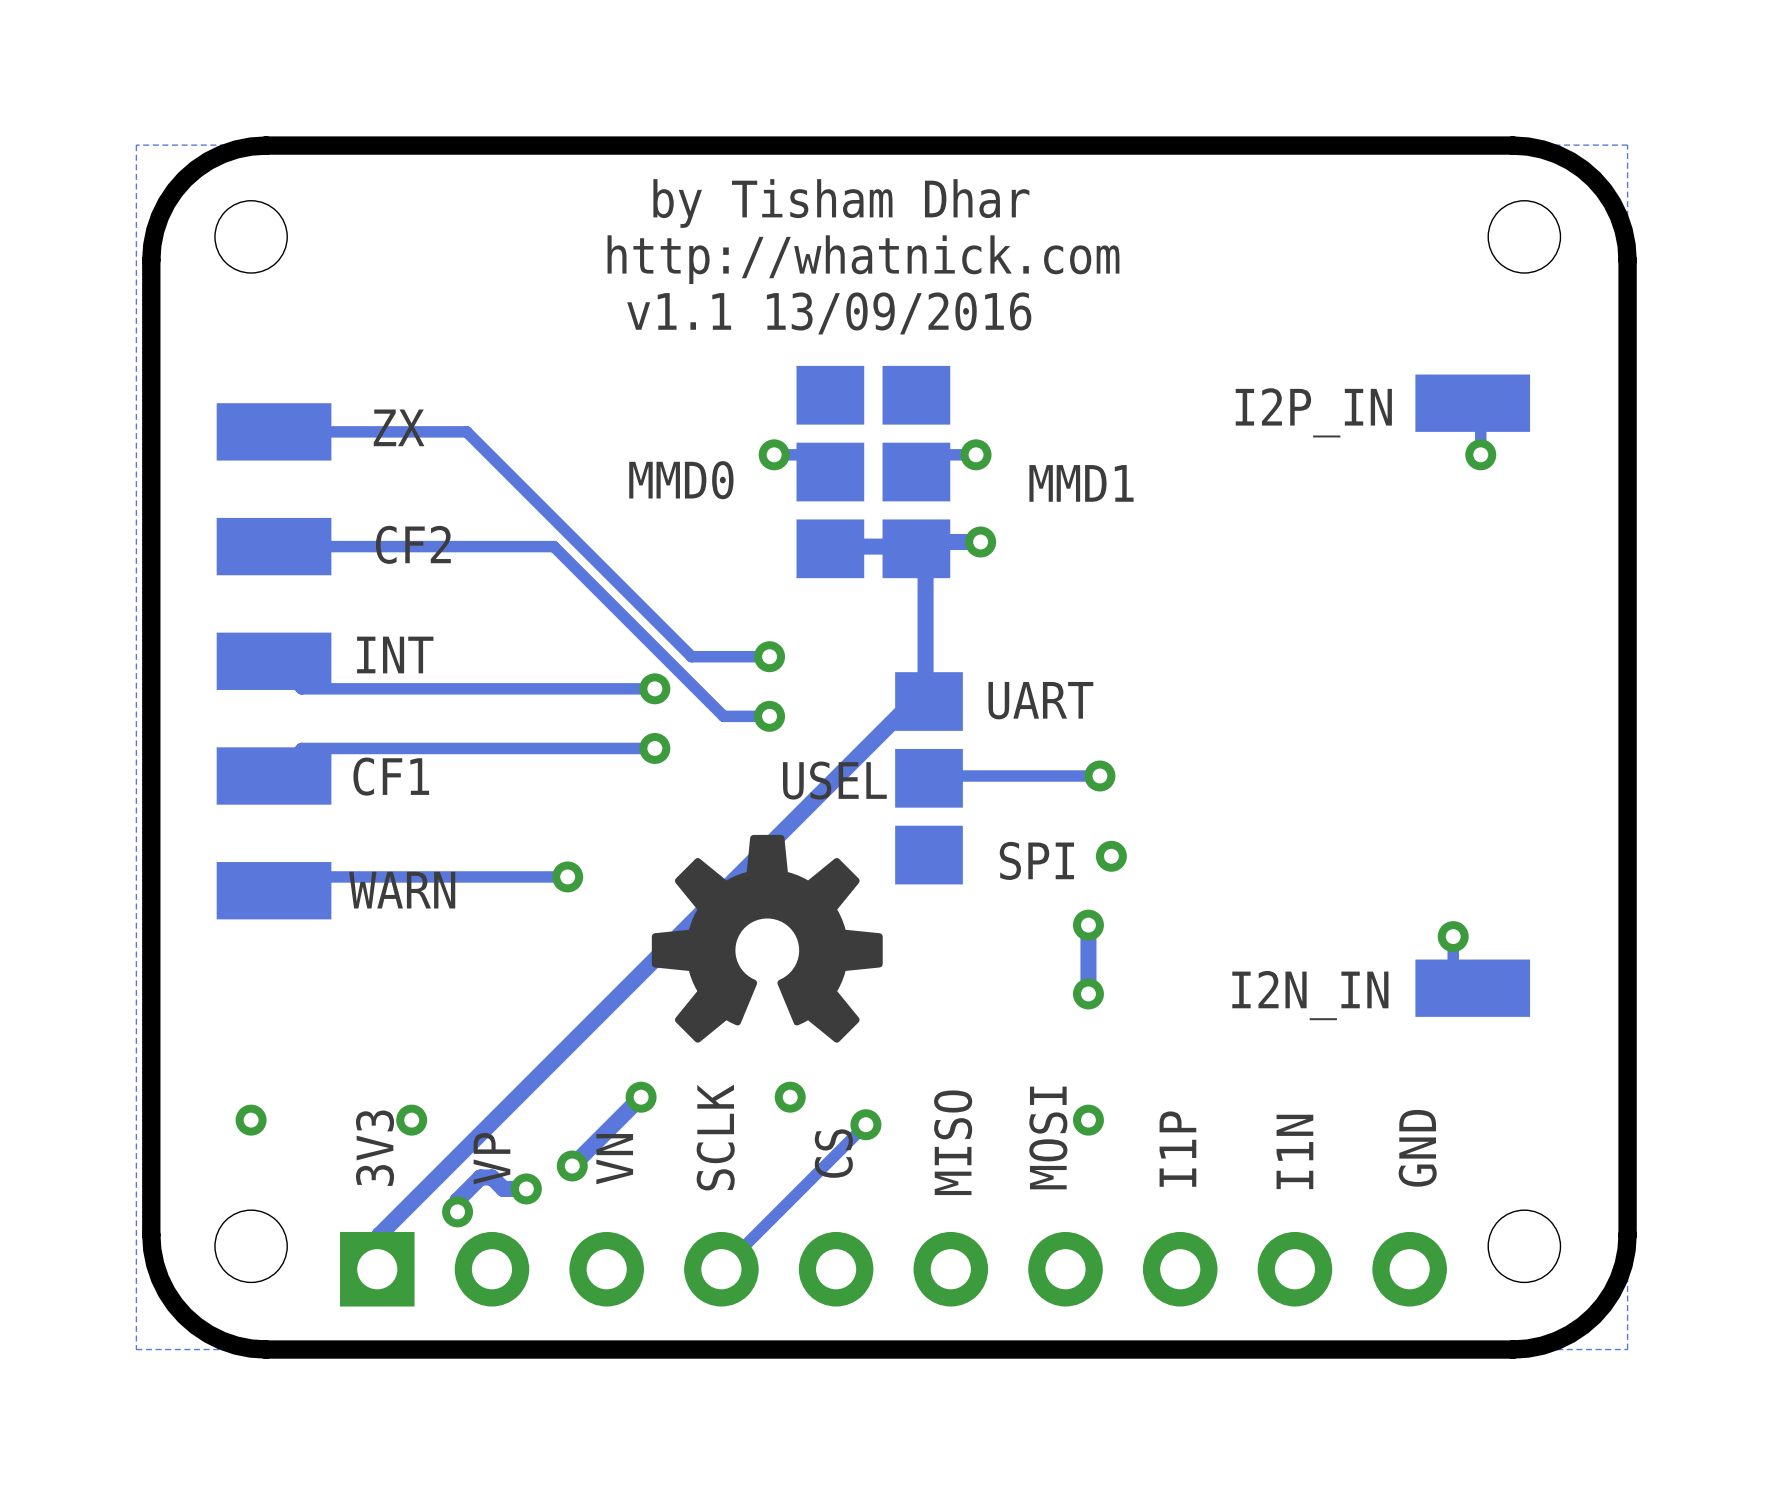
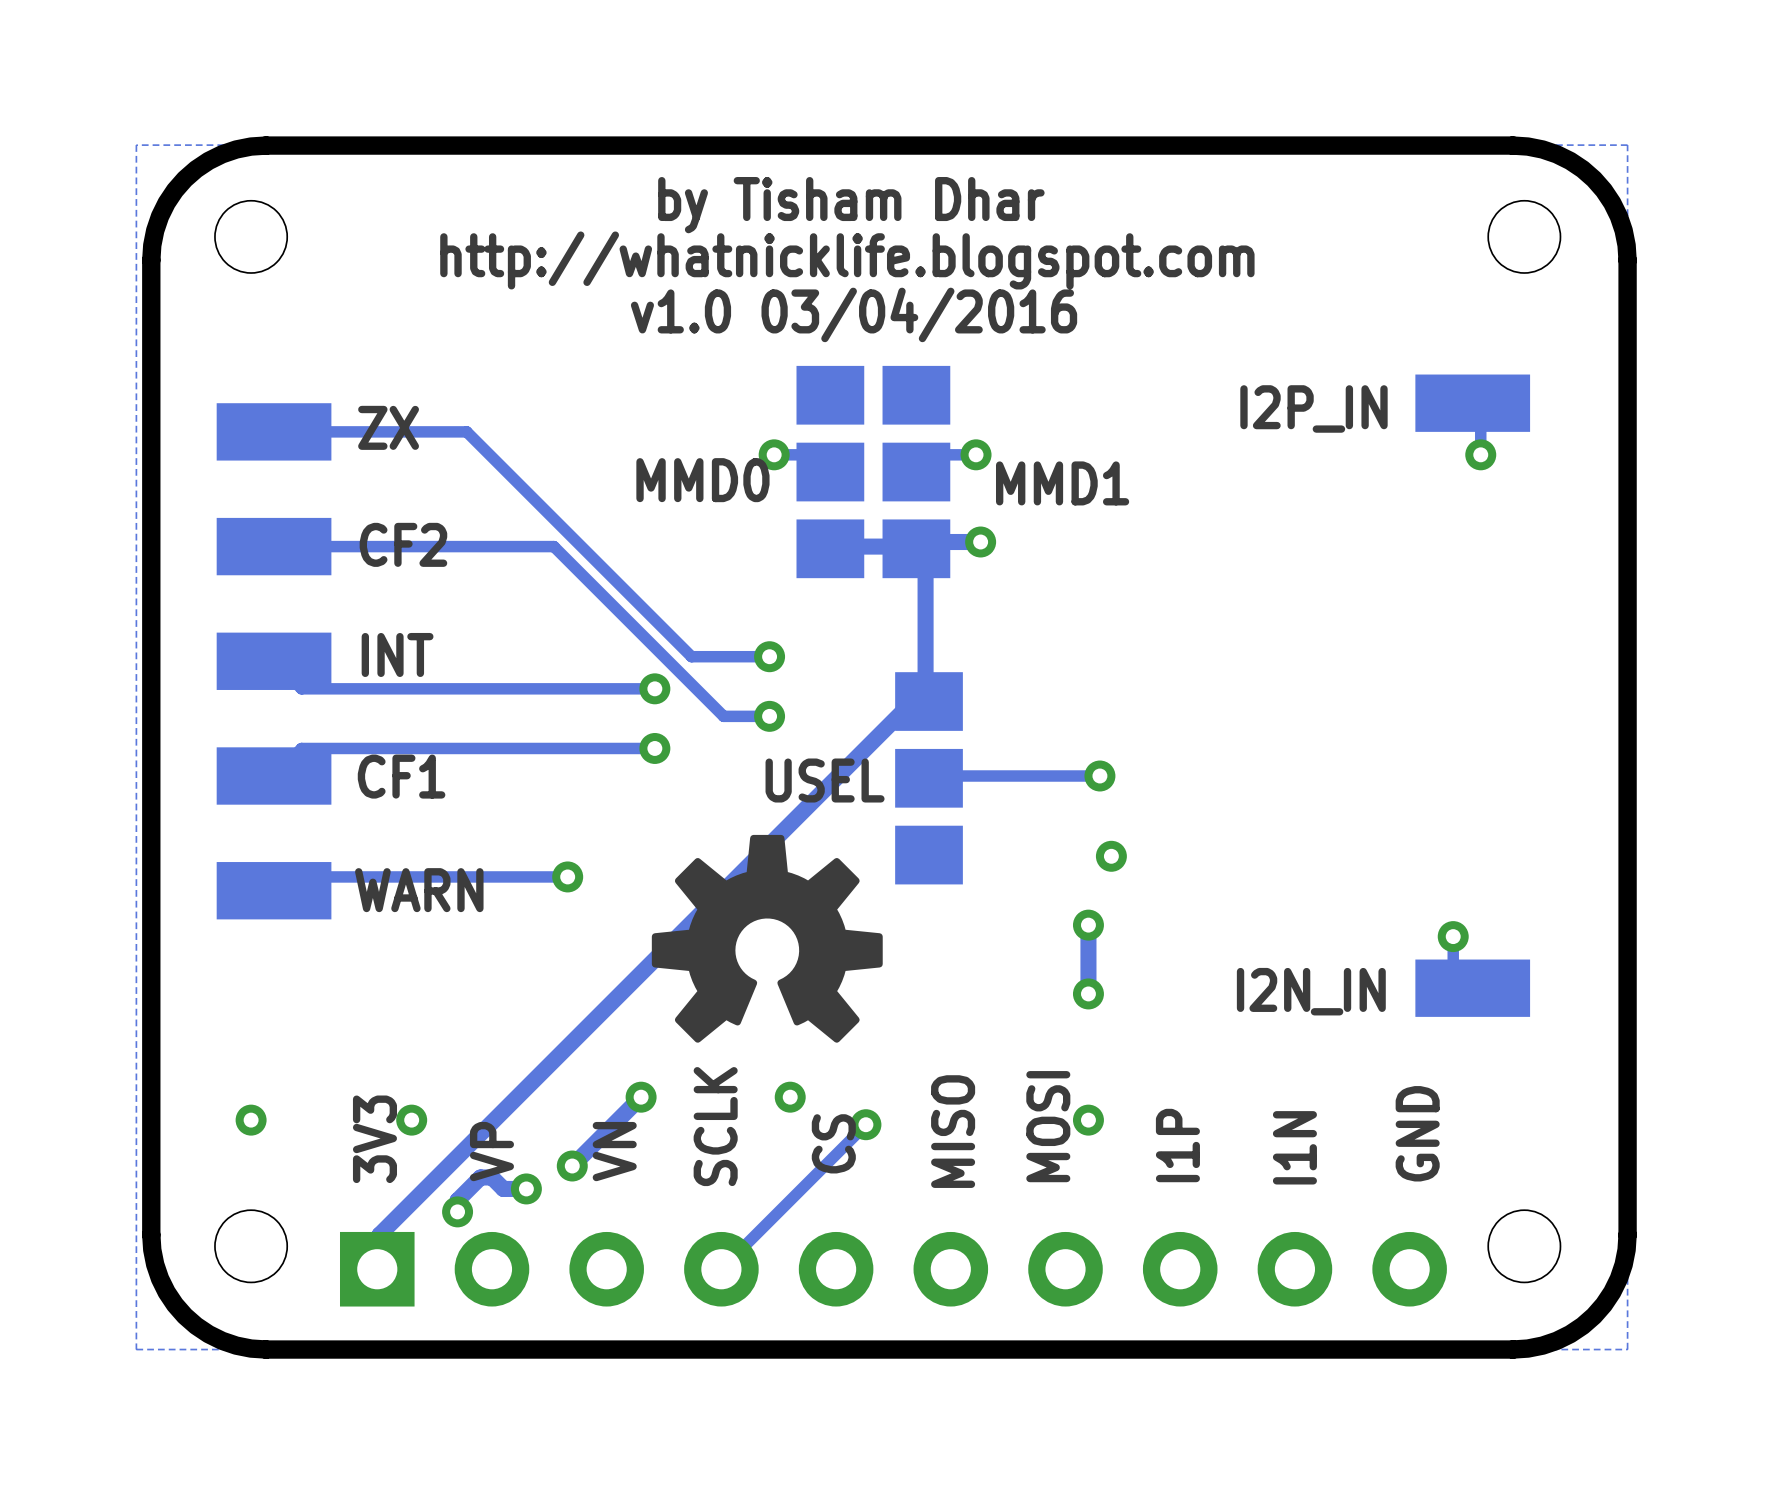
text: http://whatnick.com (863, 259) -> http://whatnicklife.blogspot.com (847, 260)
text: v1.1 13/09/2016 (829, 313) -> v1.0 03/04/2016 (854, 314)
text: UART (1040, 700) -> none
text: SPI (1036, 860) -> none

